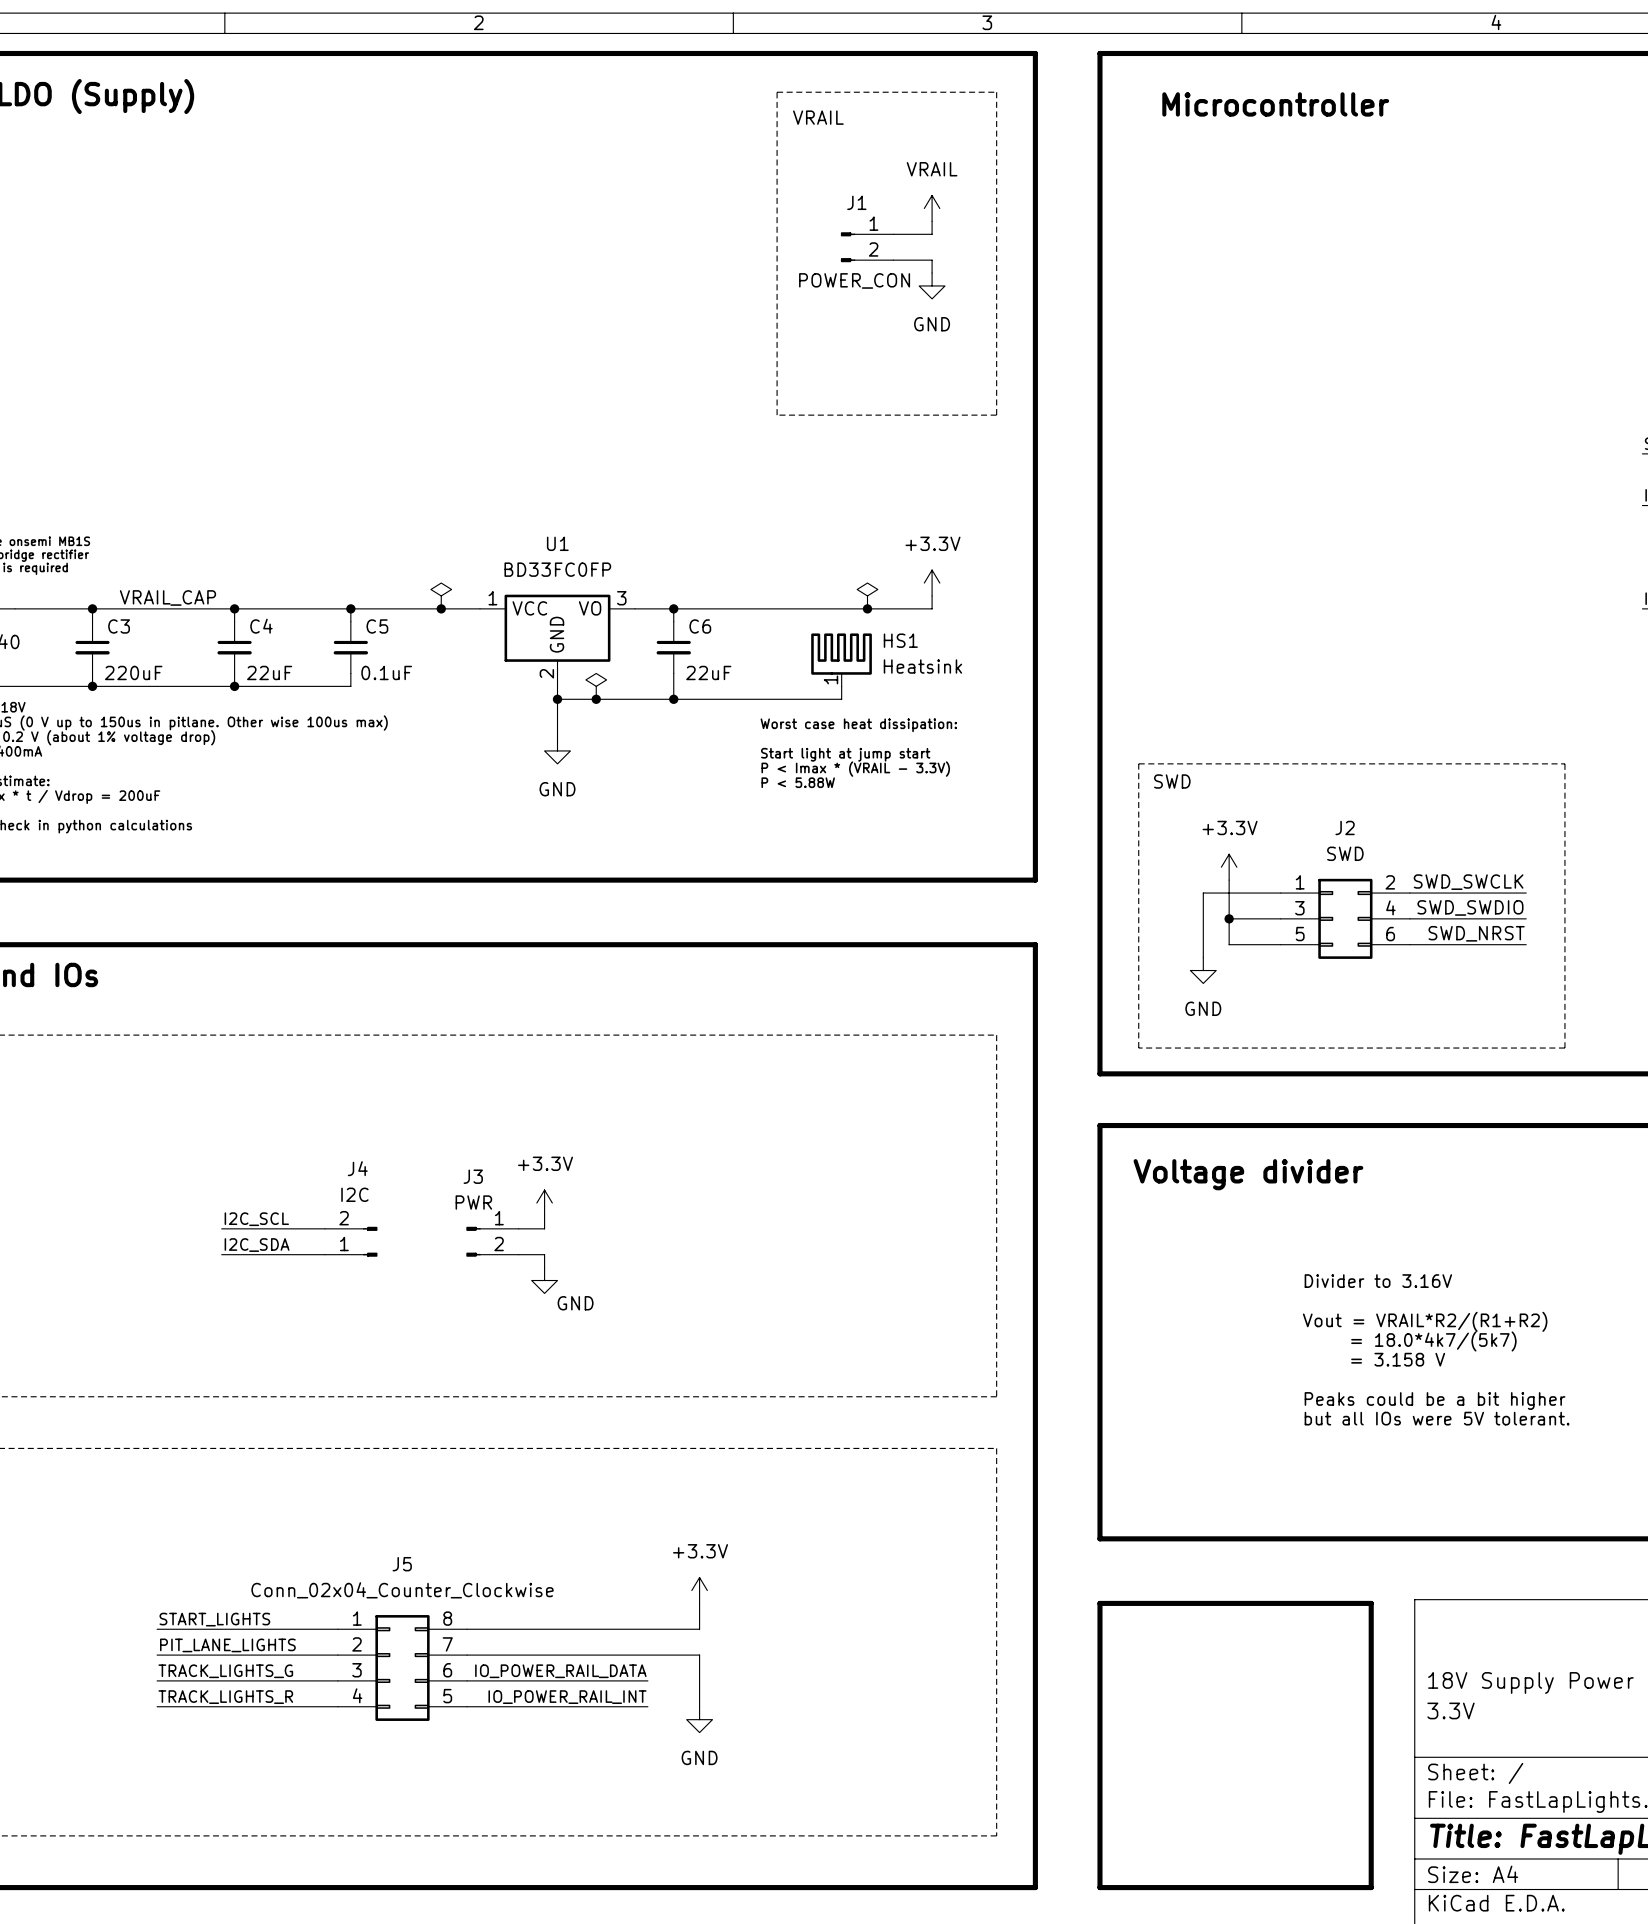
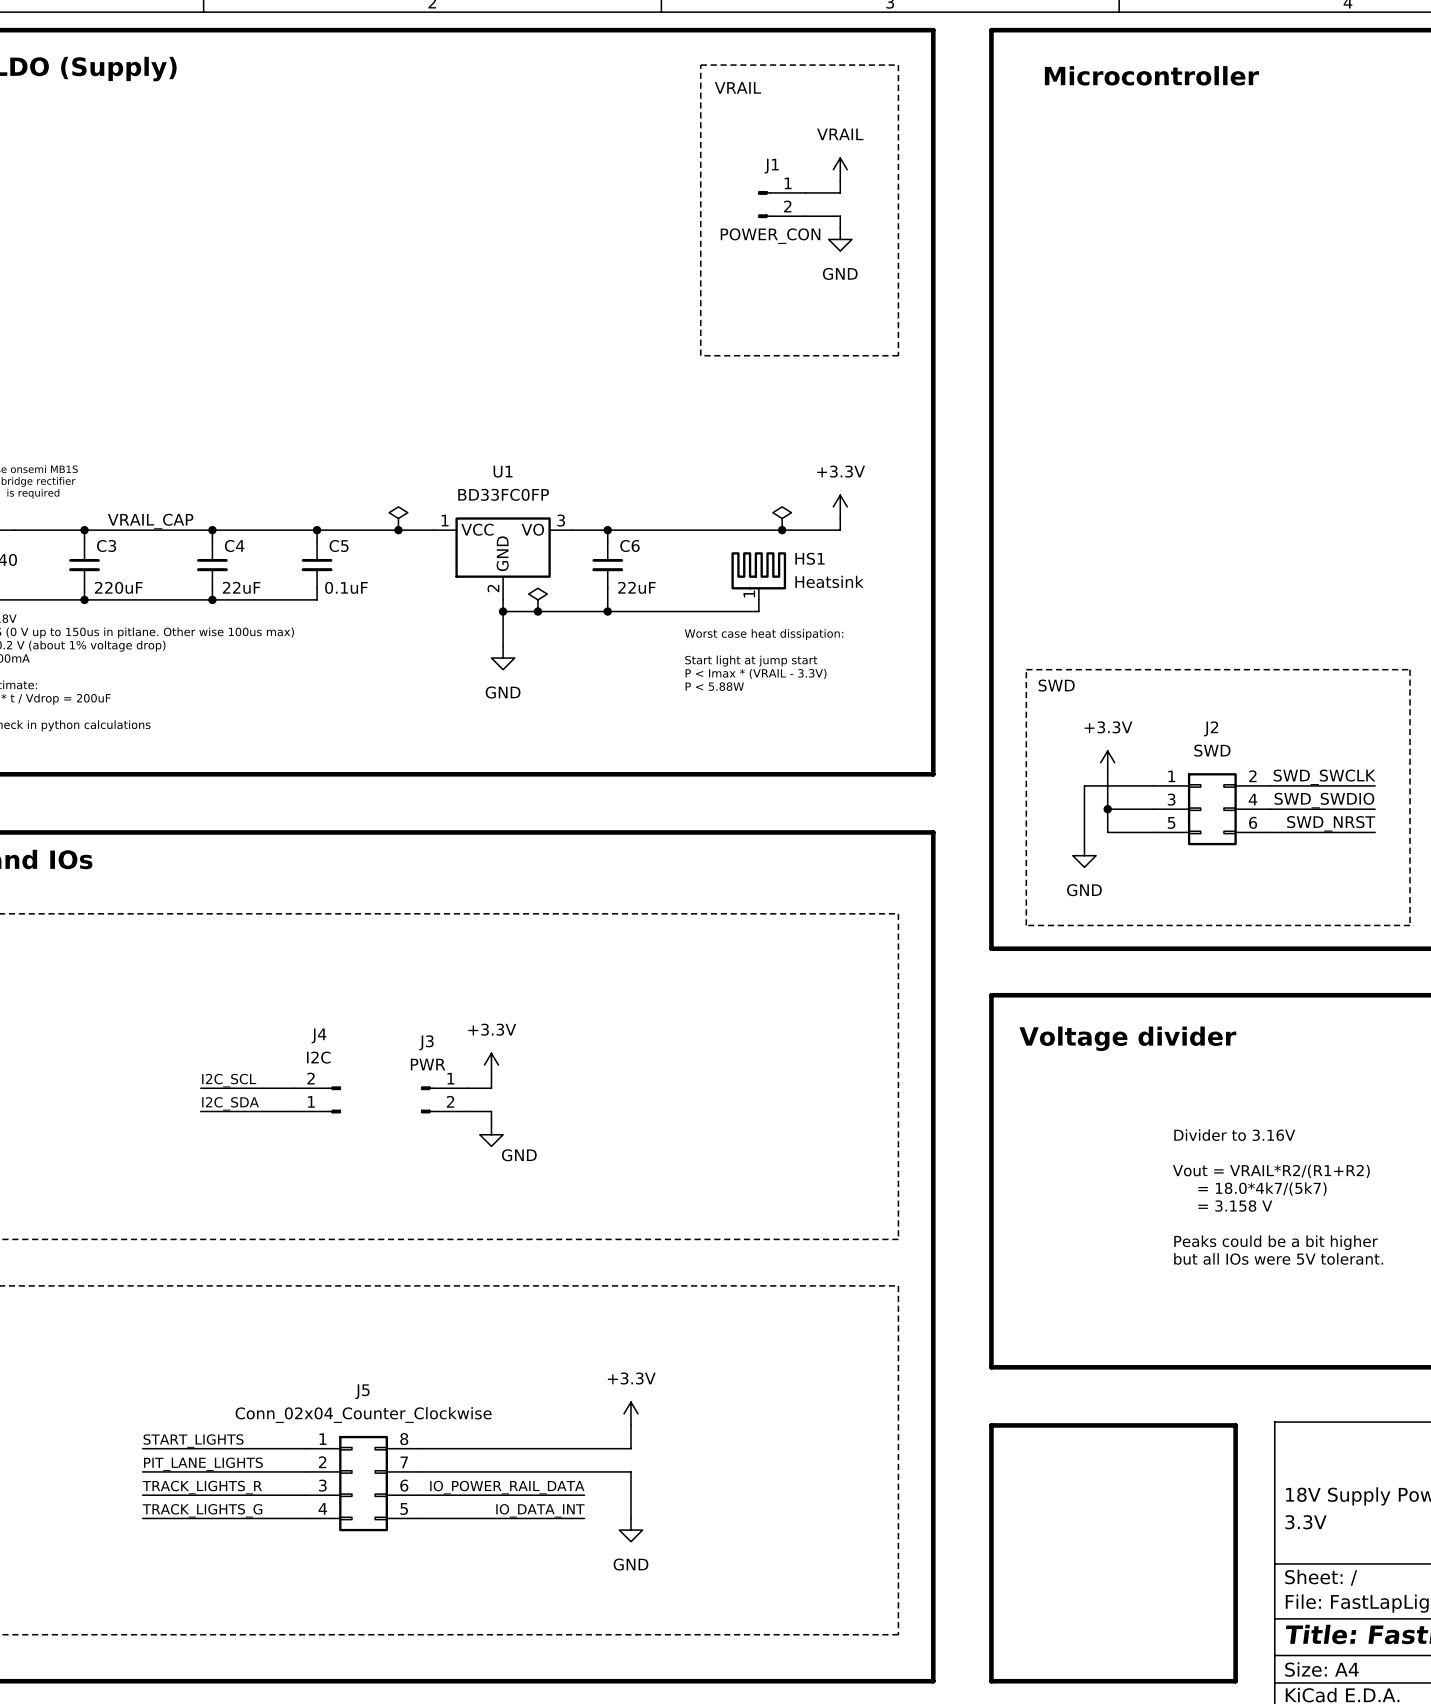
label: TRACK_LIGHTS_G (225, 1671) -> TRACK_LIGHTS_R (202, 1487)
label: TRACK_LIGHTS_R (225, 1697) -> TRACK_LIGHTS_G (202, 1510)
label: IO_POWER_RAIL_INT (567, 1697) -> IO_DATA_INT (540, 1510)

